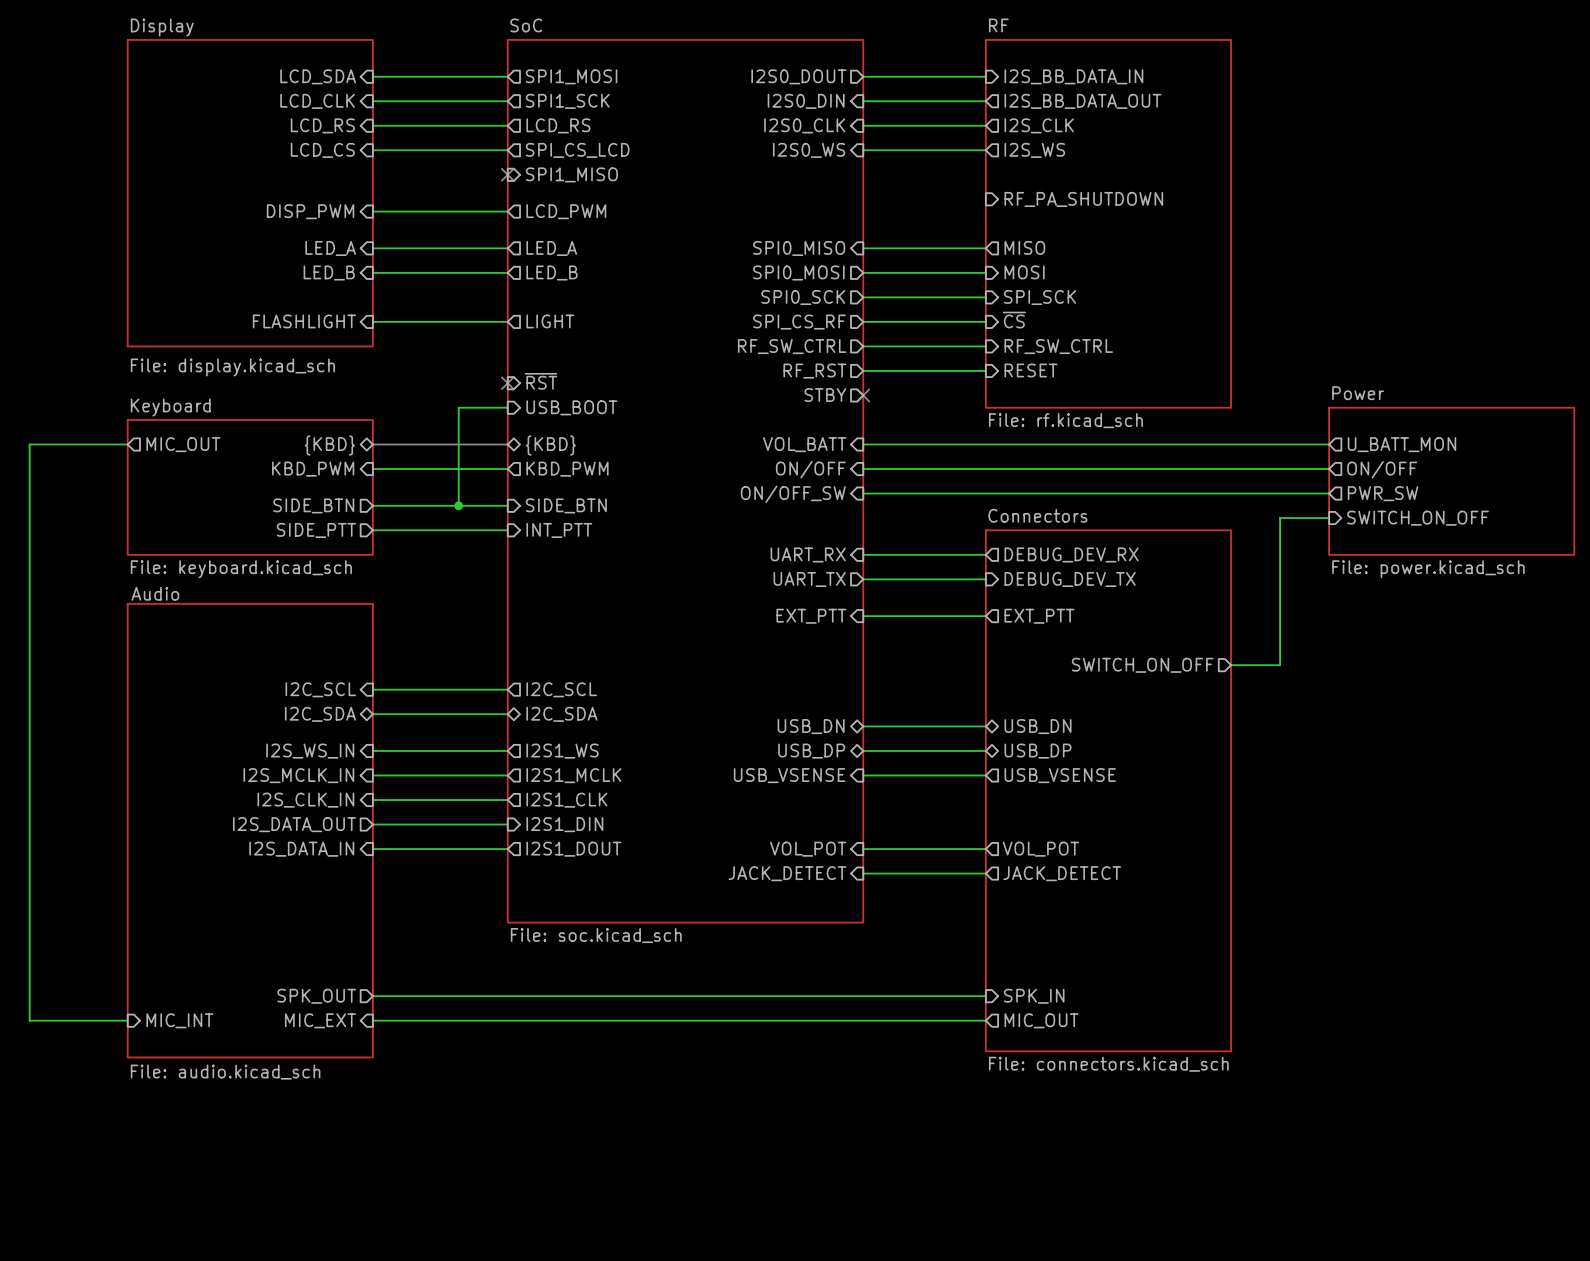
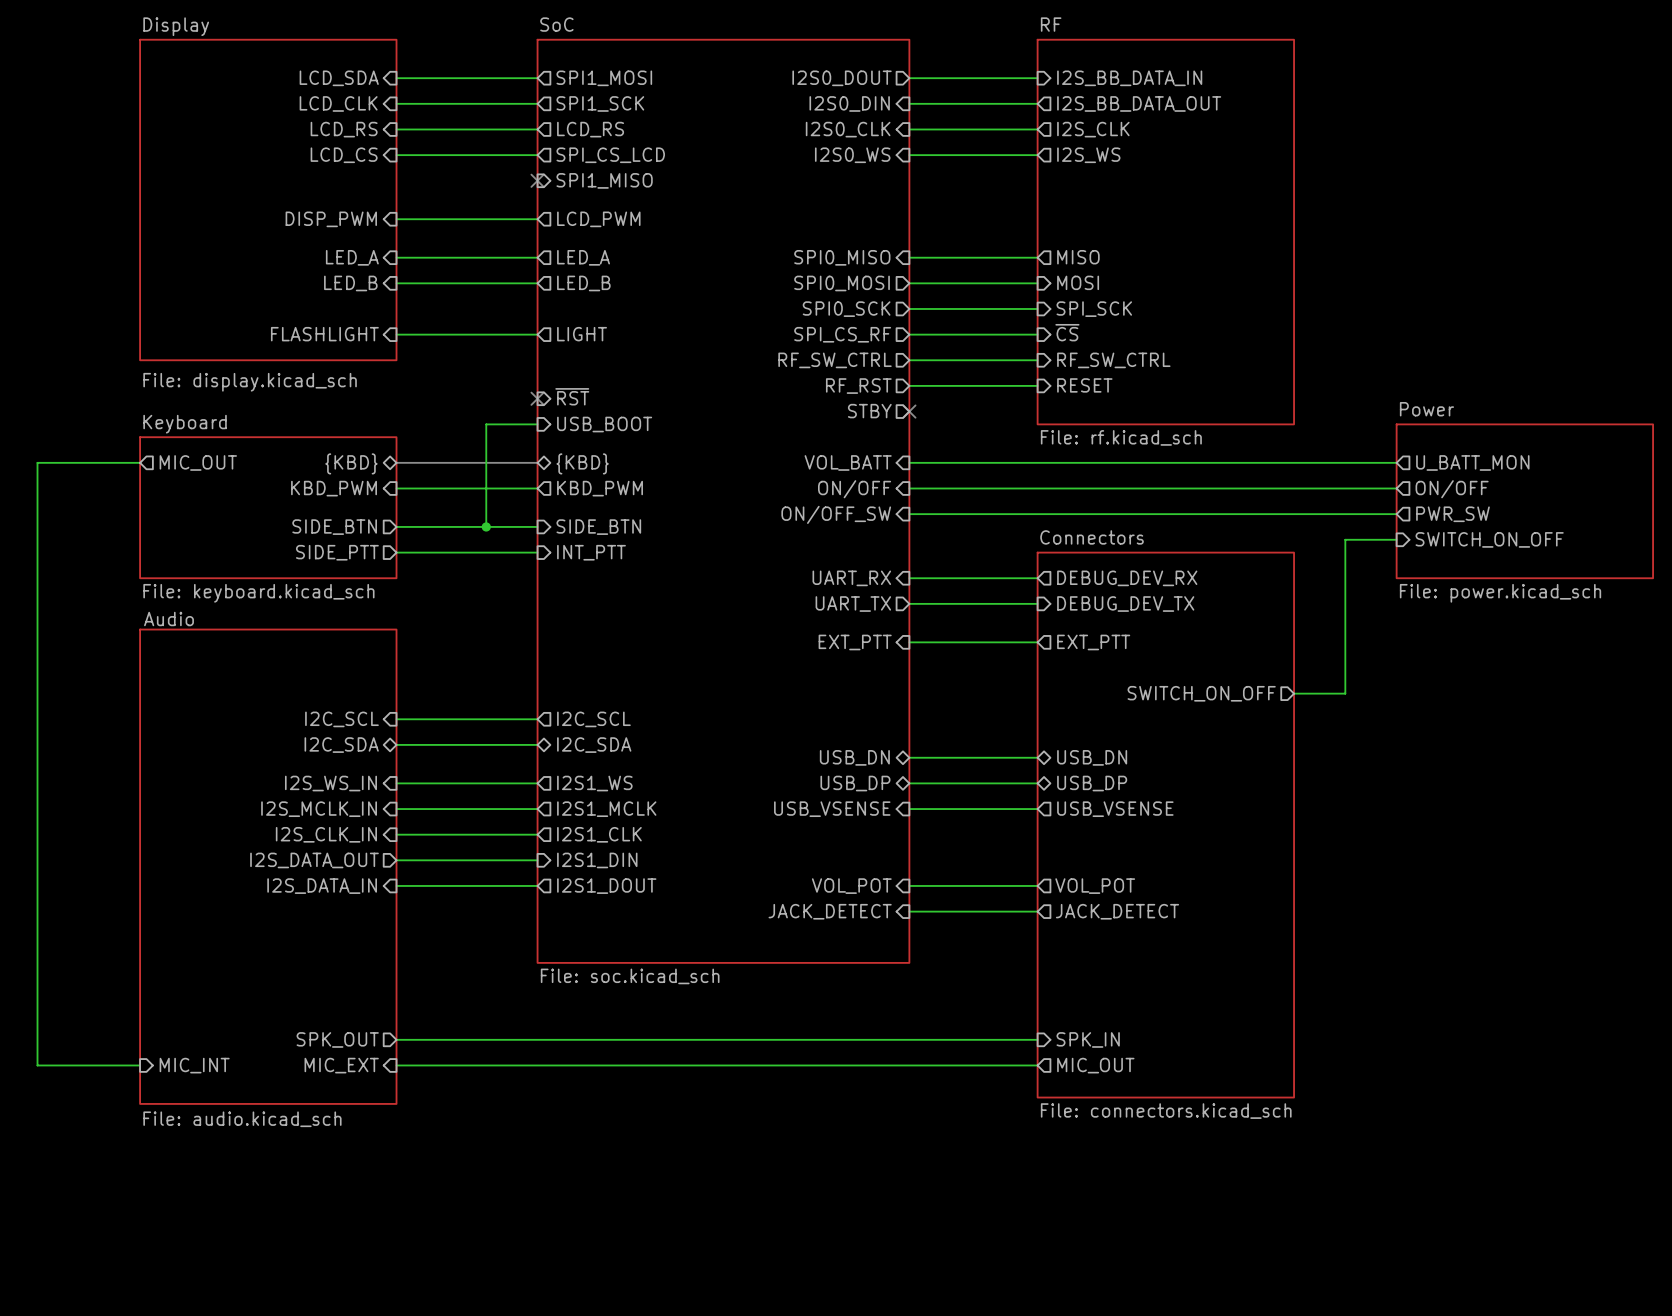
sheet pin: RF_PA_SHUTDOWN (1083, 199) -> none

